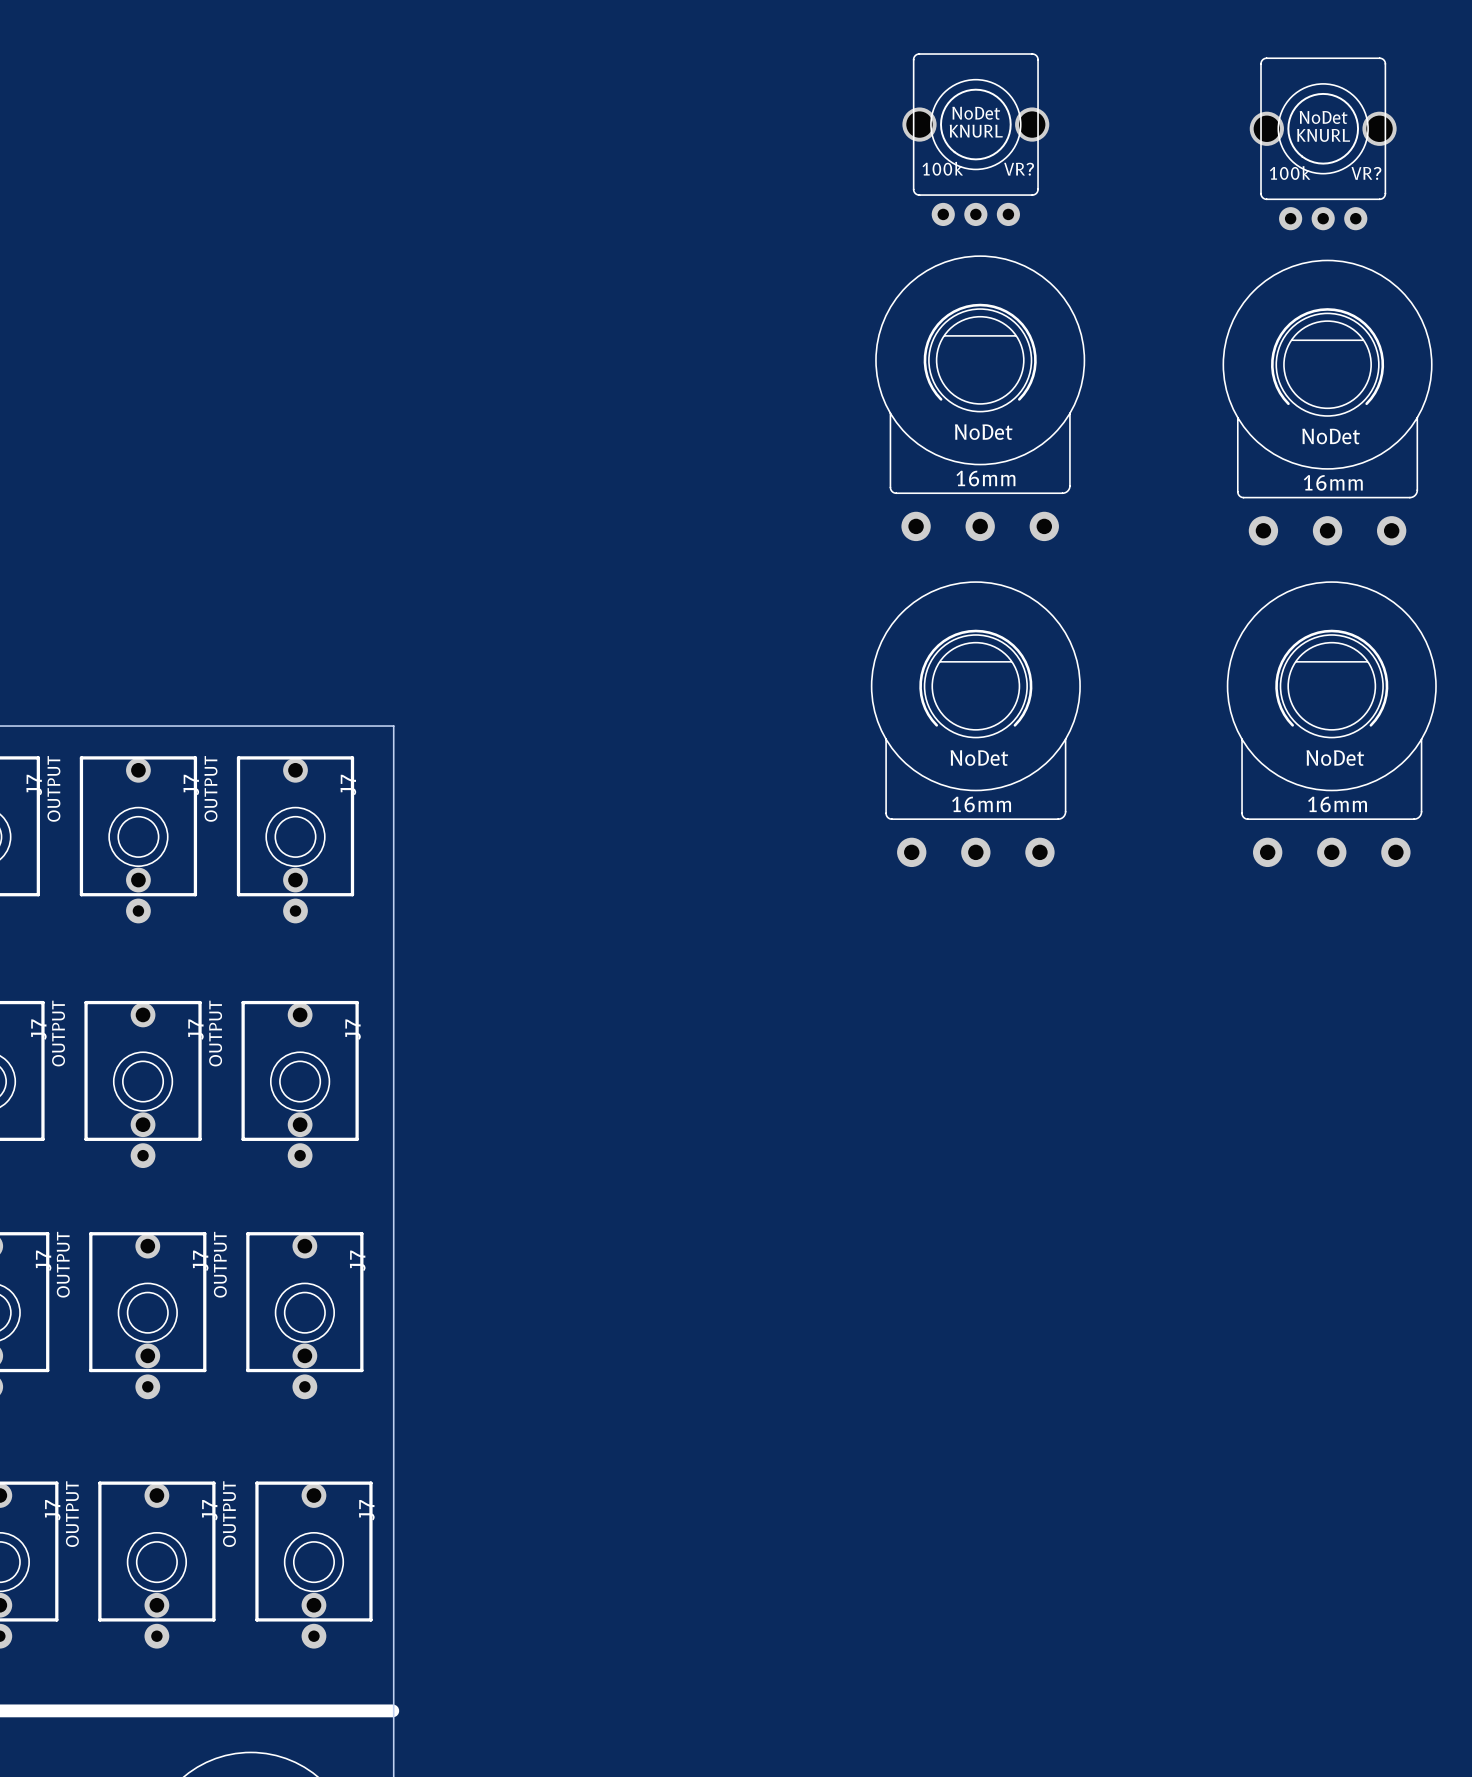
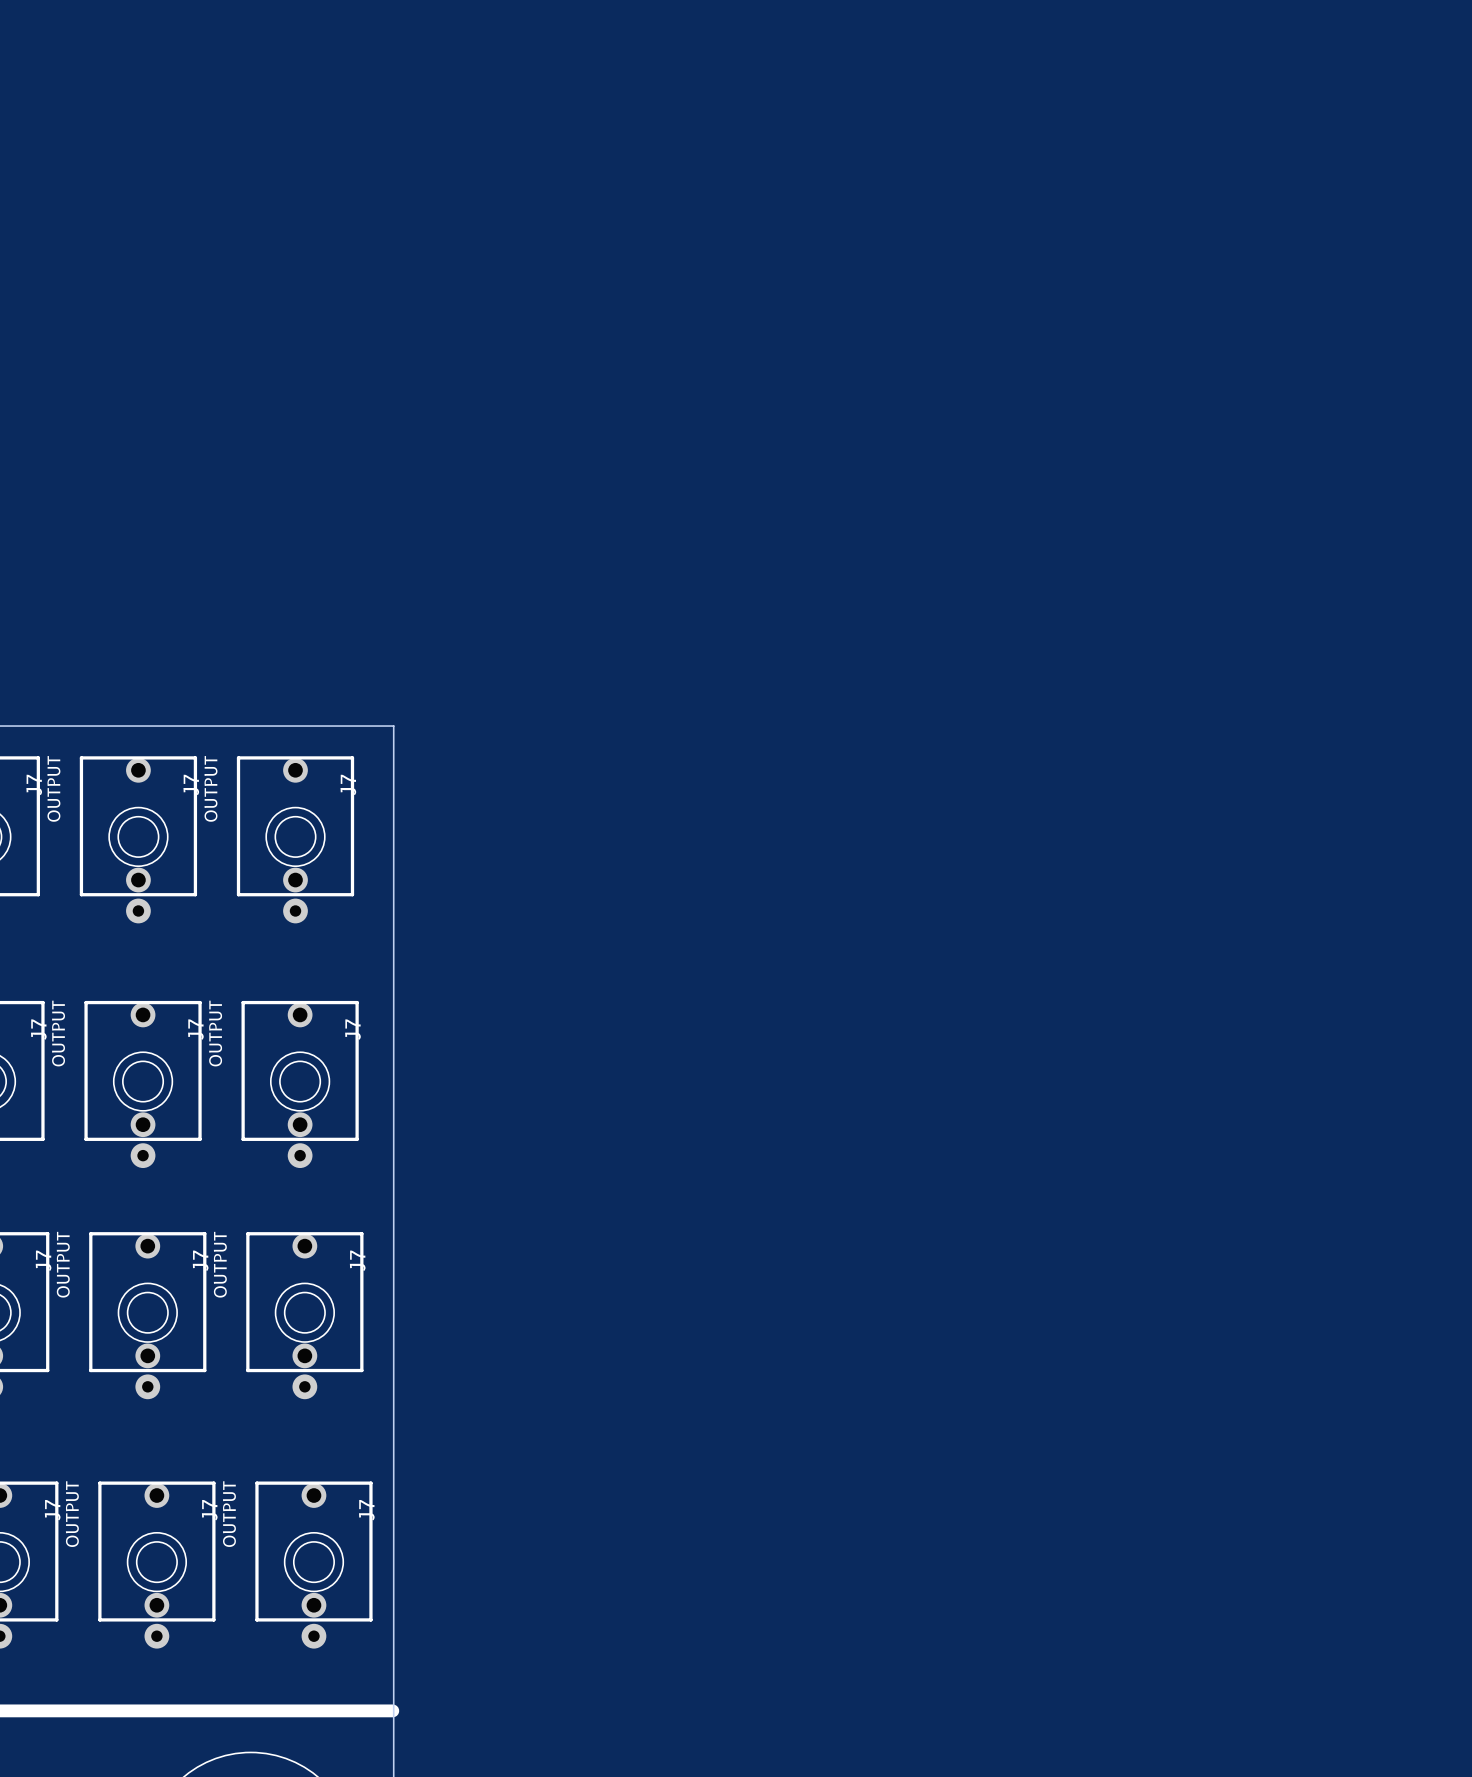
VR?: 100k (975, 139) -> none
VR?: 100k (1323, 143) -> none
16mm: NoDet (980, 398) -> none
16mm: NoDet (1327, 402) -> none
16mm: NoDet (975, 724) -> none
16mm: NoDet (1331, 724) -> none

